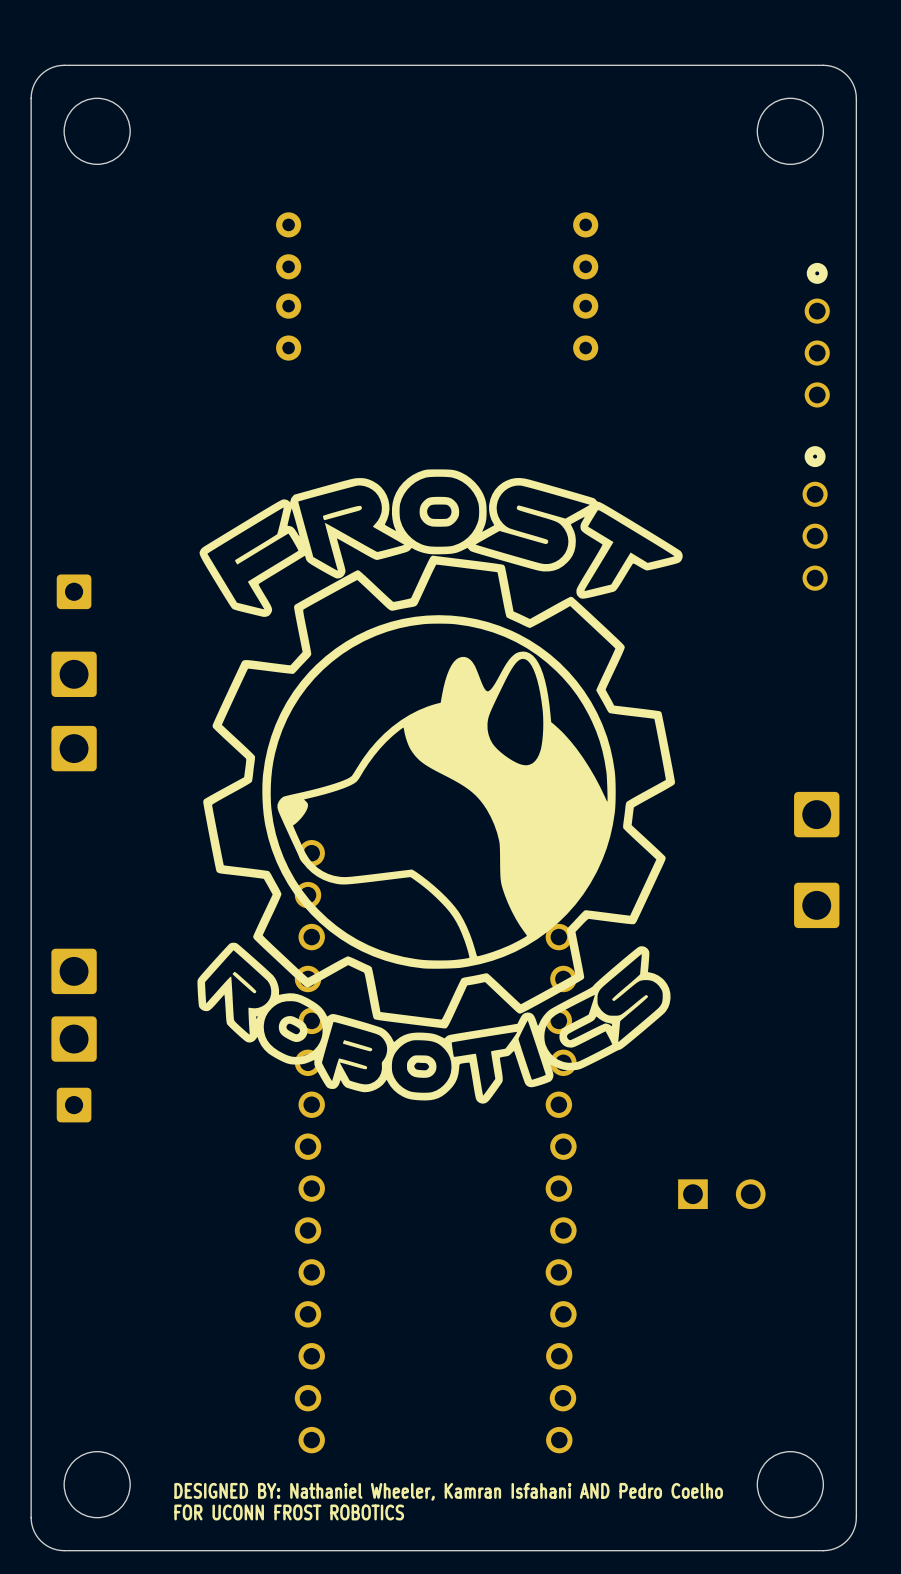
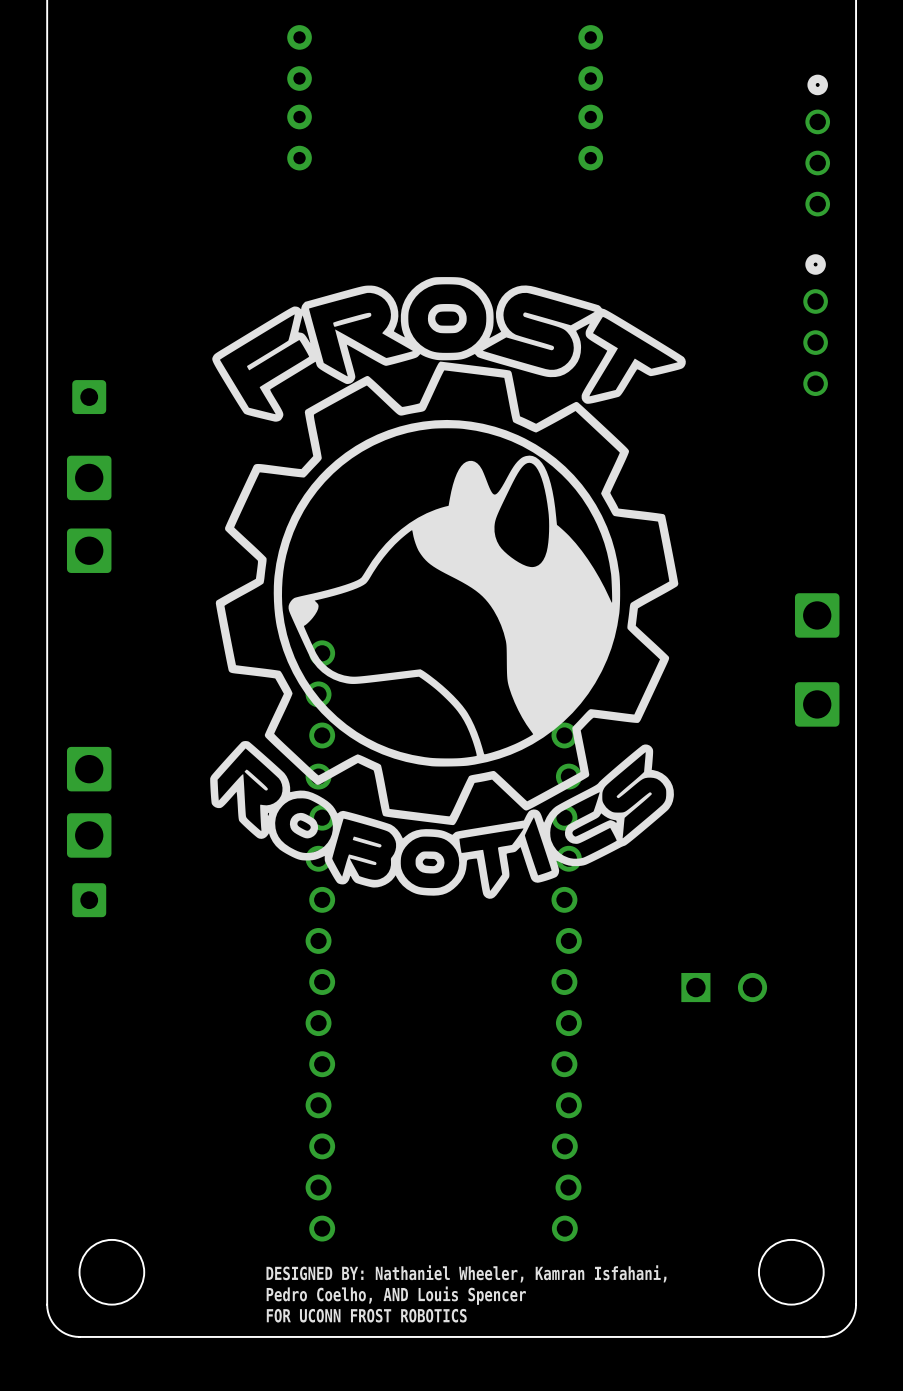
text: DESIGNED BY: Nathaniel Wheeler, Kamran Isfahani AND Pedro Coelho (448, 1491) -> DESIGNED BY: Nathaniel Wheeler, Kamran Isfahani, (466, 1273)
text: none -> Pedro Coelho, AND Louis Spencer (396, 1295)
text position: FOR UCONN FROST ROBOTICS (289, 1512) -> FOR UCONN FROST ROBOTICS (366, 1315)

